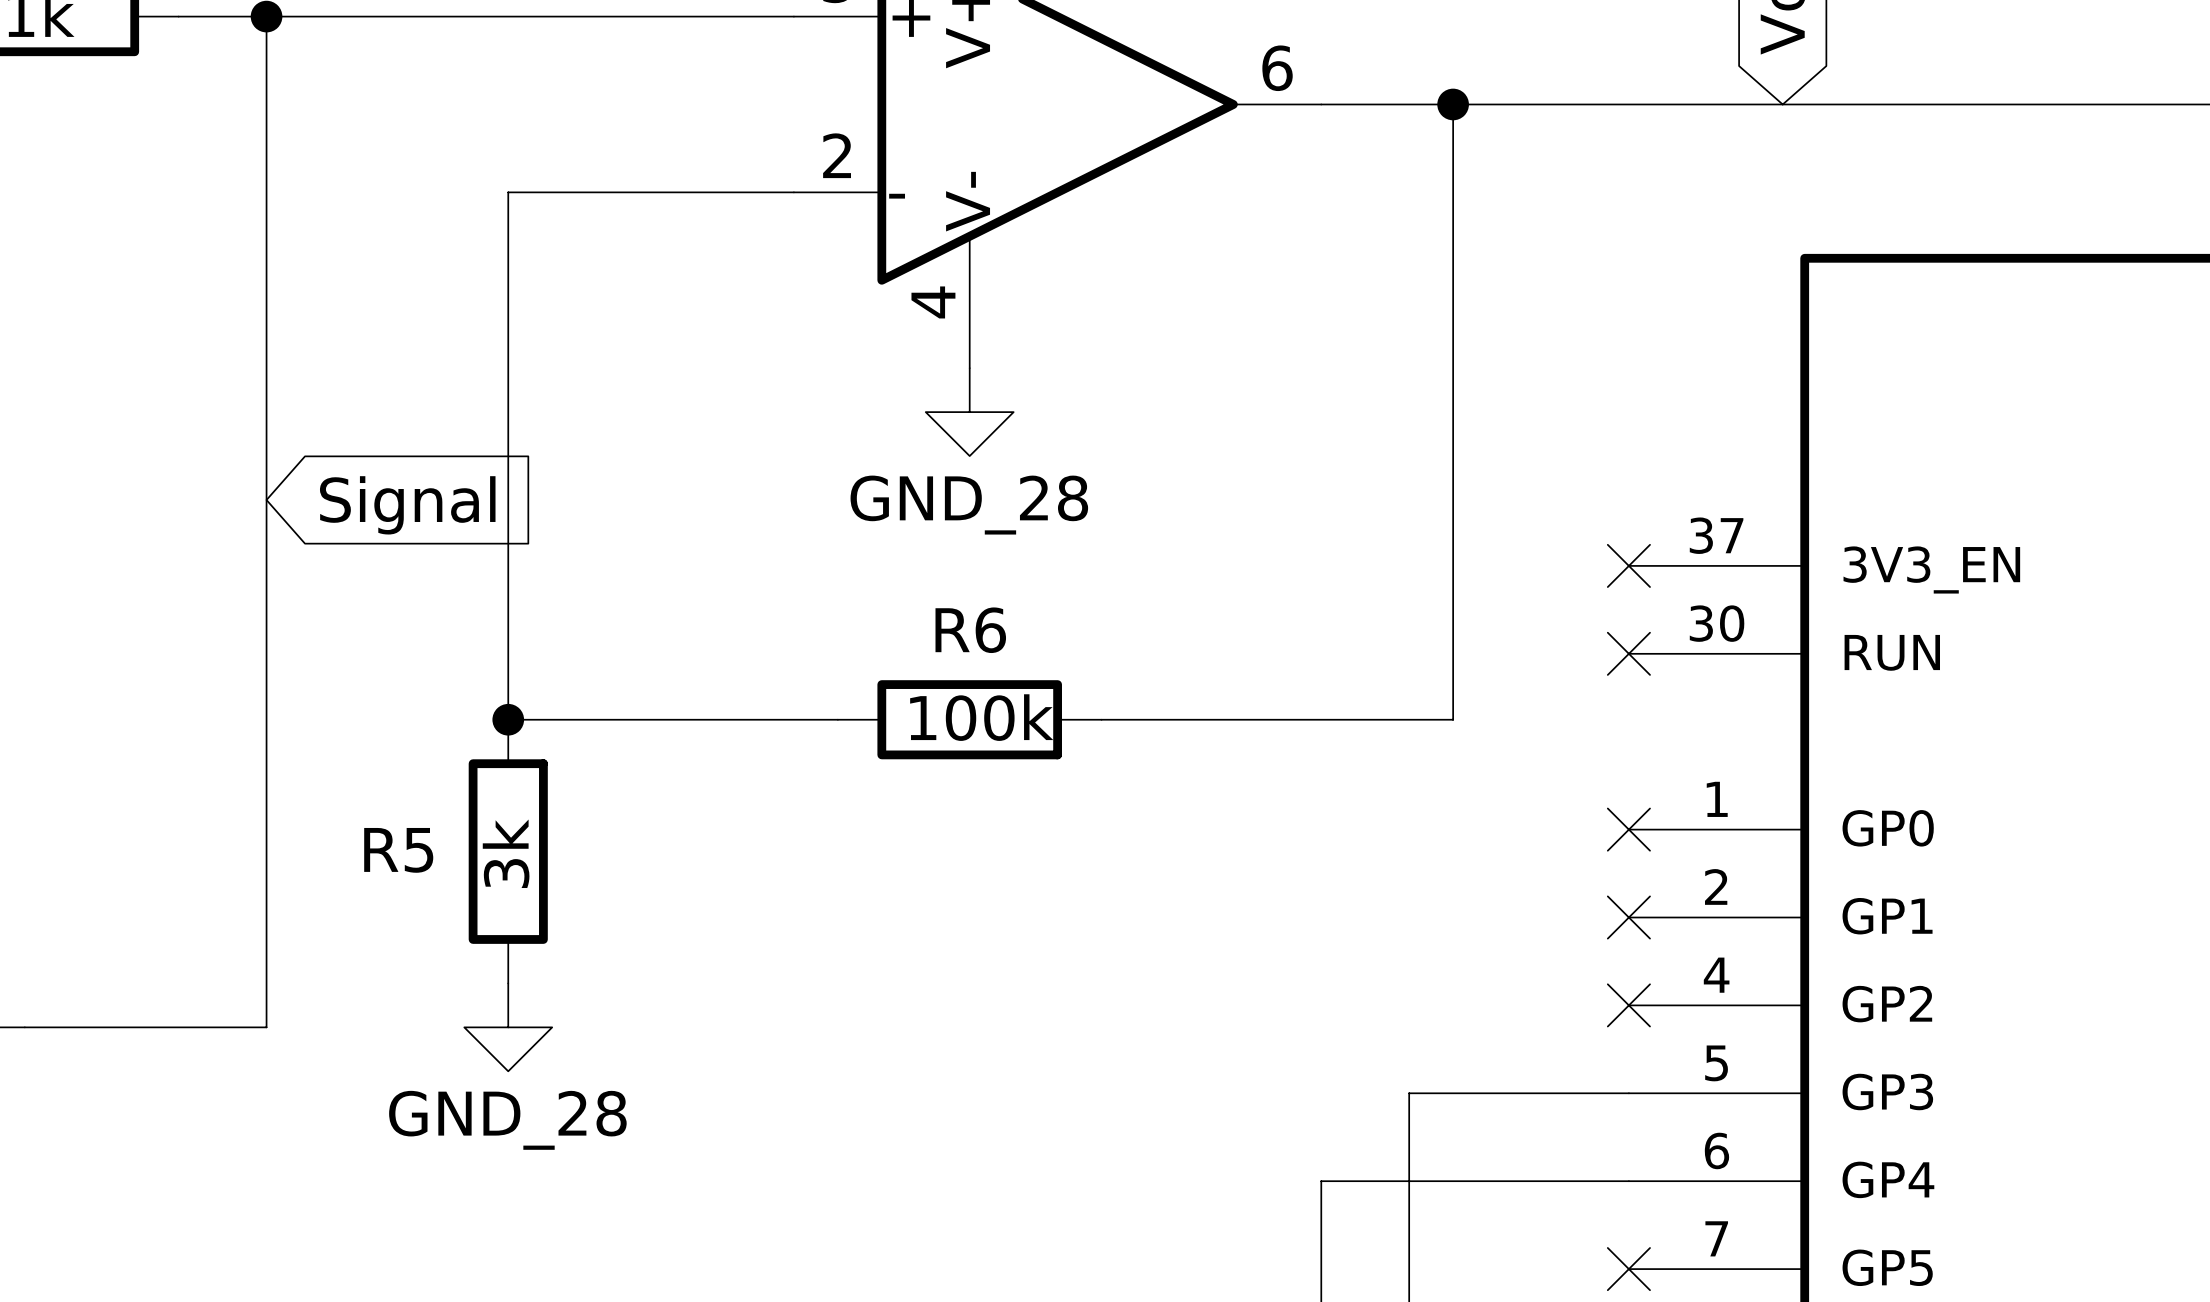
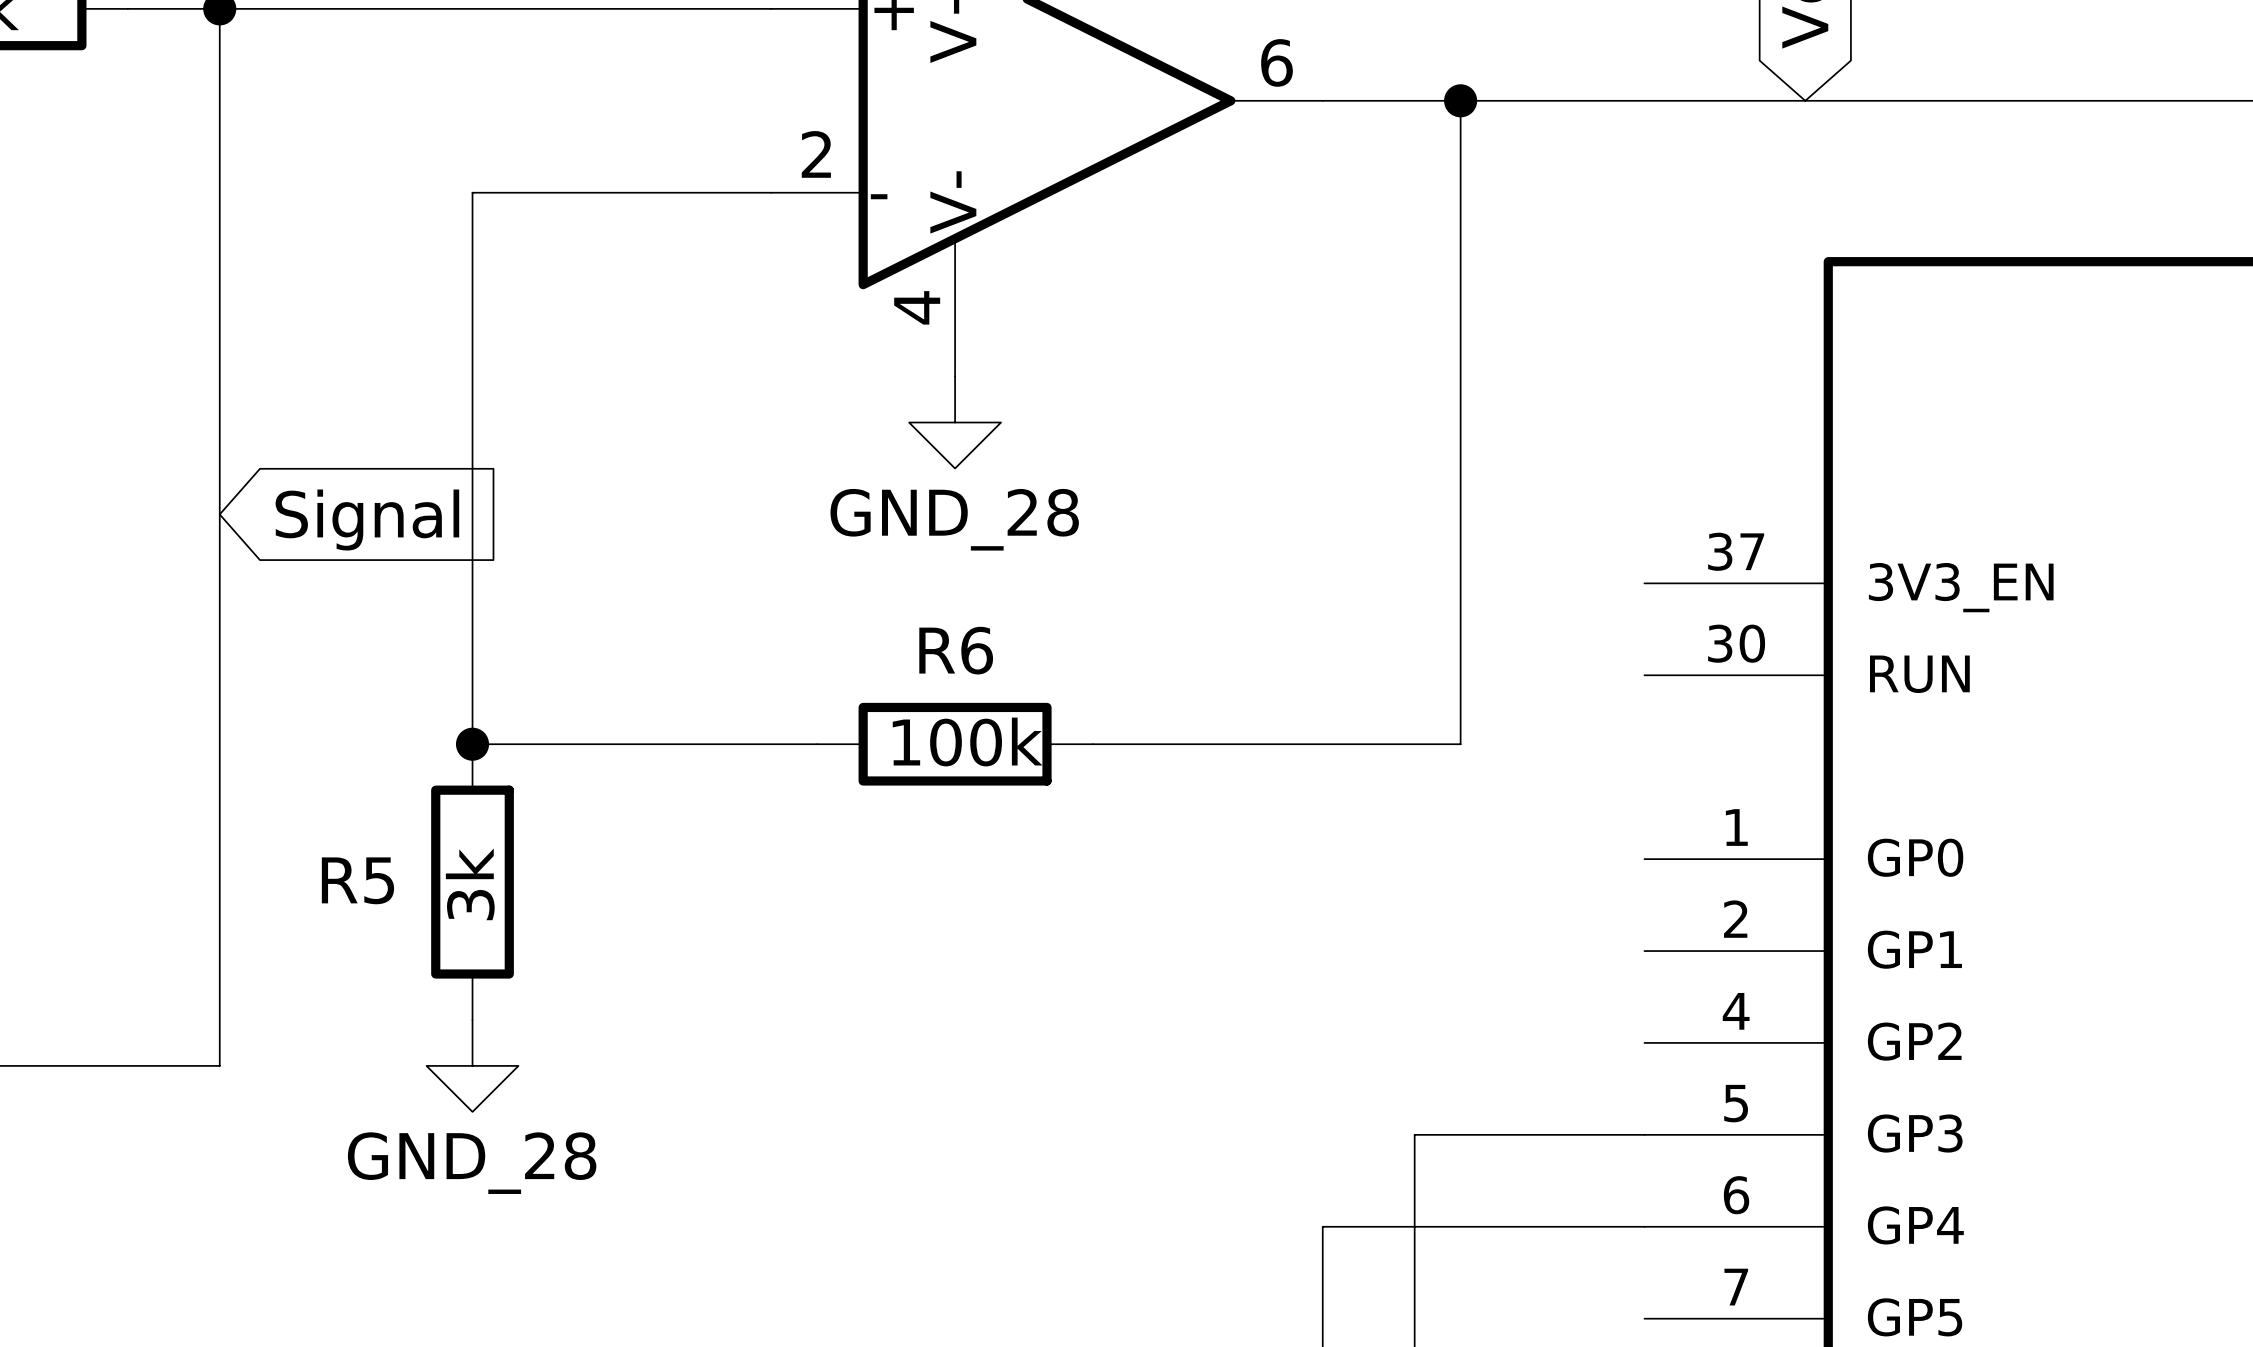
no-connect mark: (1628, 565) -> none
no-connect mark: (1628, 653) -> none
no-connect mark: (1628, 829) -> none
no-connect mark: (1628, 917) -> none
no-connect mark: (1628, 1005) -> none
no-connect mark: (1628, 1269) -> none

